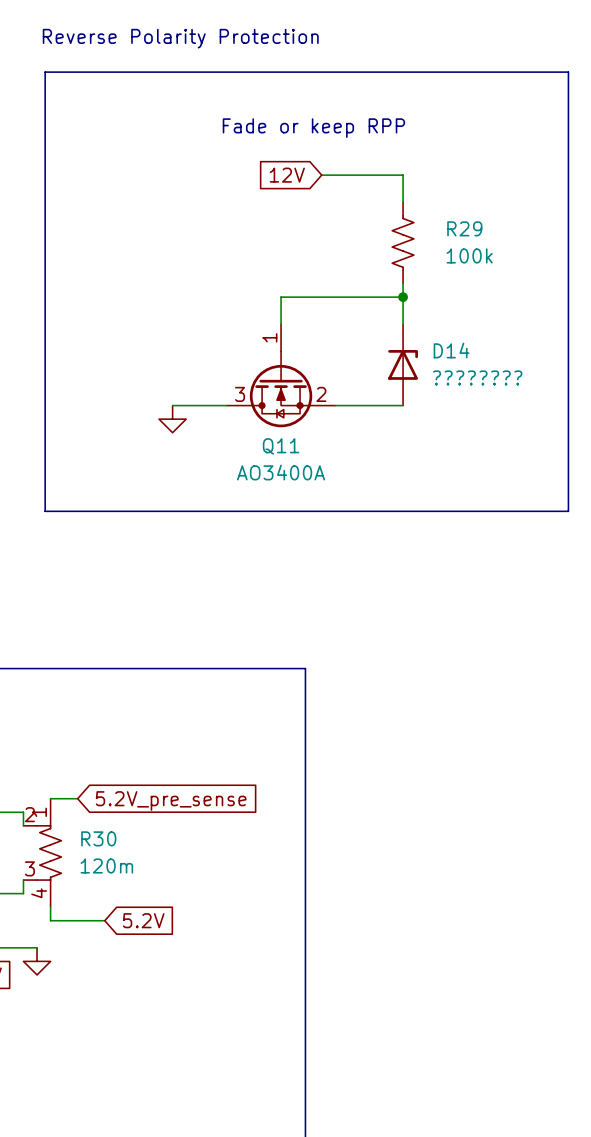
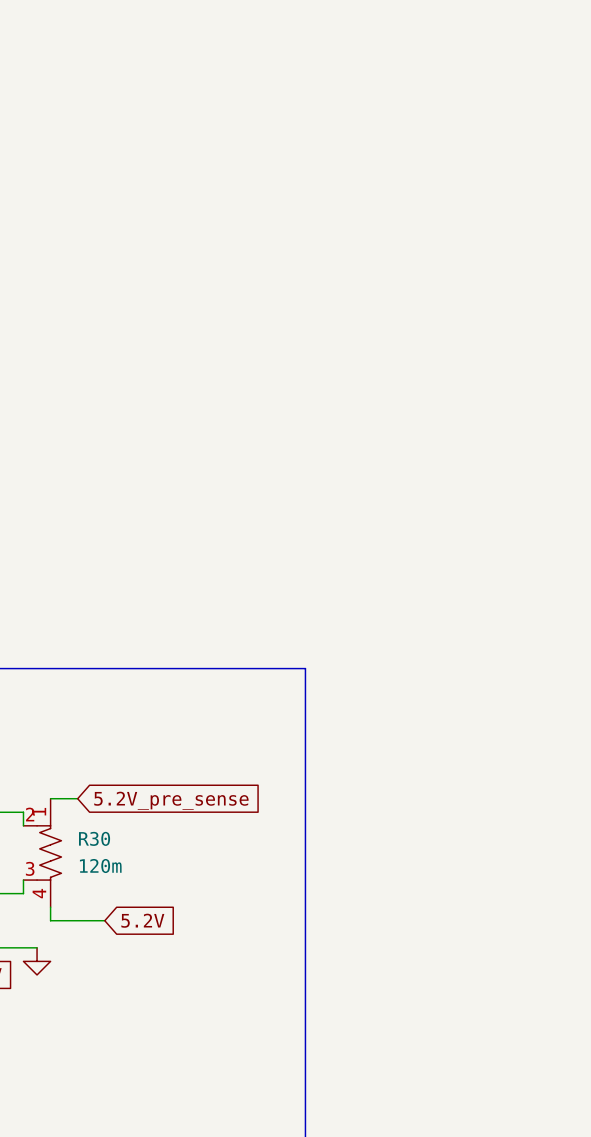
text: Reverse Polarity Protection (180, 38) -> none
line: (45, 72) (568, 72) (568, 511) (45, 511) (45, 72) -> none
text: Fade or keep RPP (313, 128) -> none
global label: 12V (287, 175) -> none
wire: (321, 175) (403, 175) (403, 202) -> none
R29: 100k (403, 242) -> none
wire: (403, 283) (403, 324) -> none
wire: (403, 297) (281, 297) (281, 324) -> none
junction: (403, 297) -> none
D14: ???????? (403, 364) -> none
Q11: AO3400A (281, 375) -> none
wire: (172, 405) (226, 405) -> none
wire: (335, 405) (403, 405) -> none
power symbol: (172, 419) -> none

